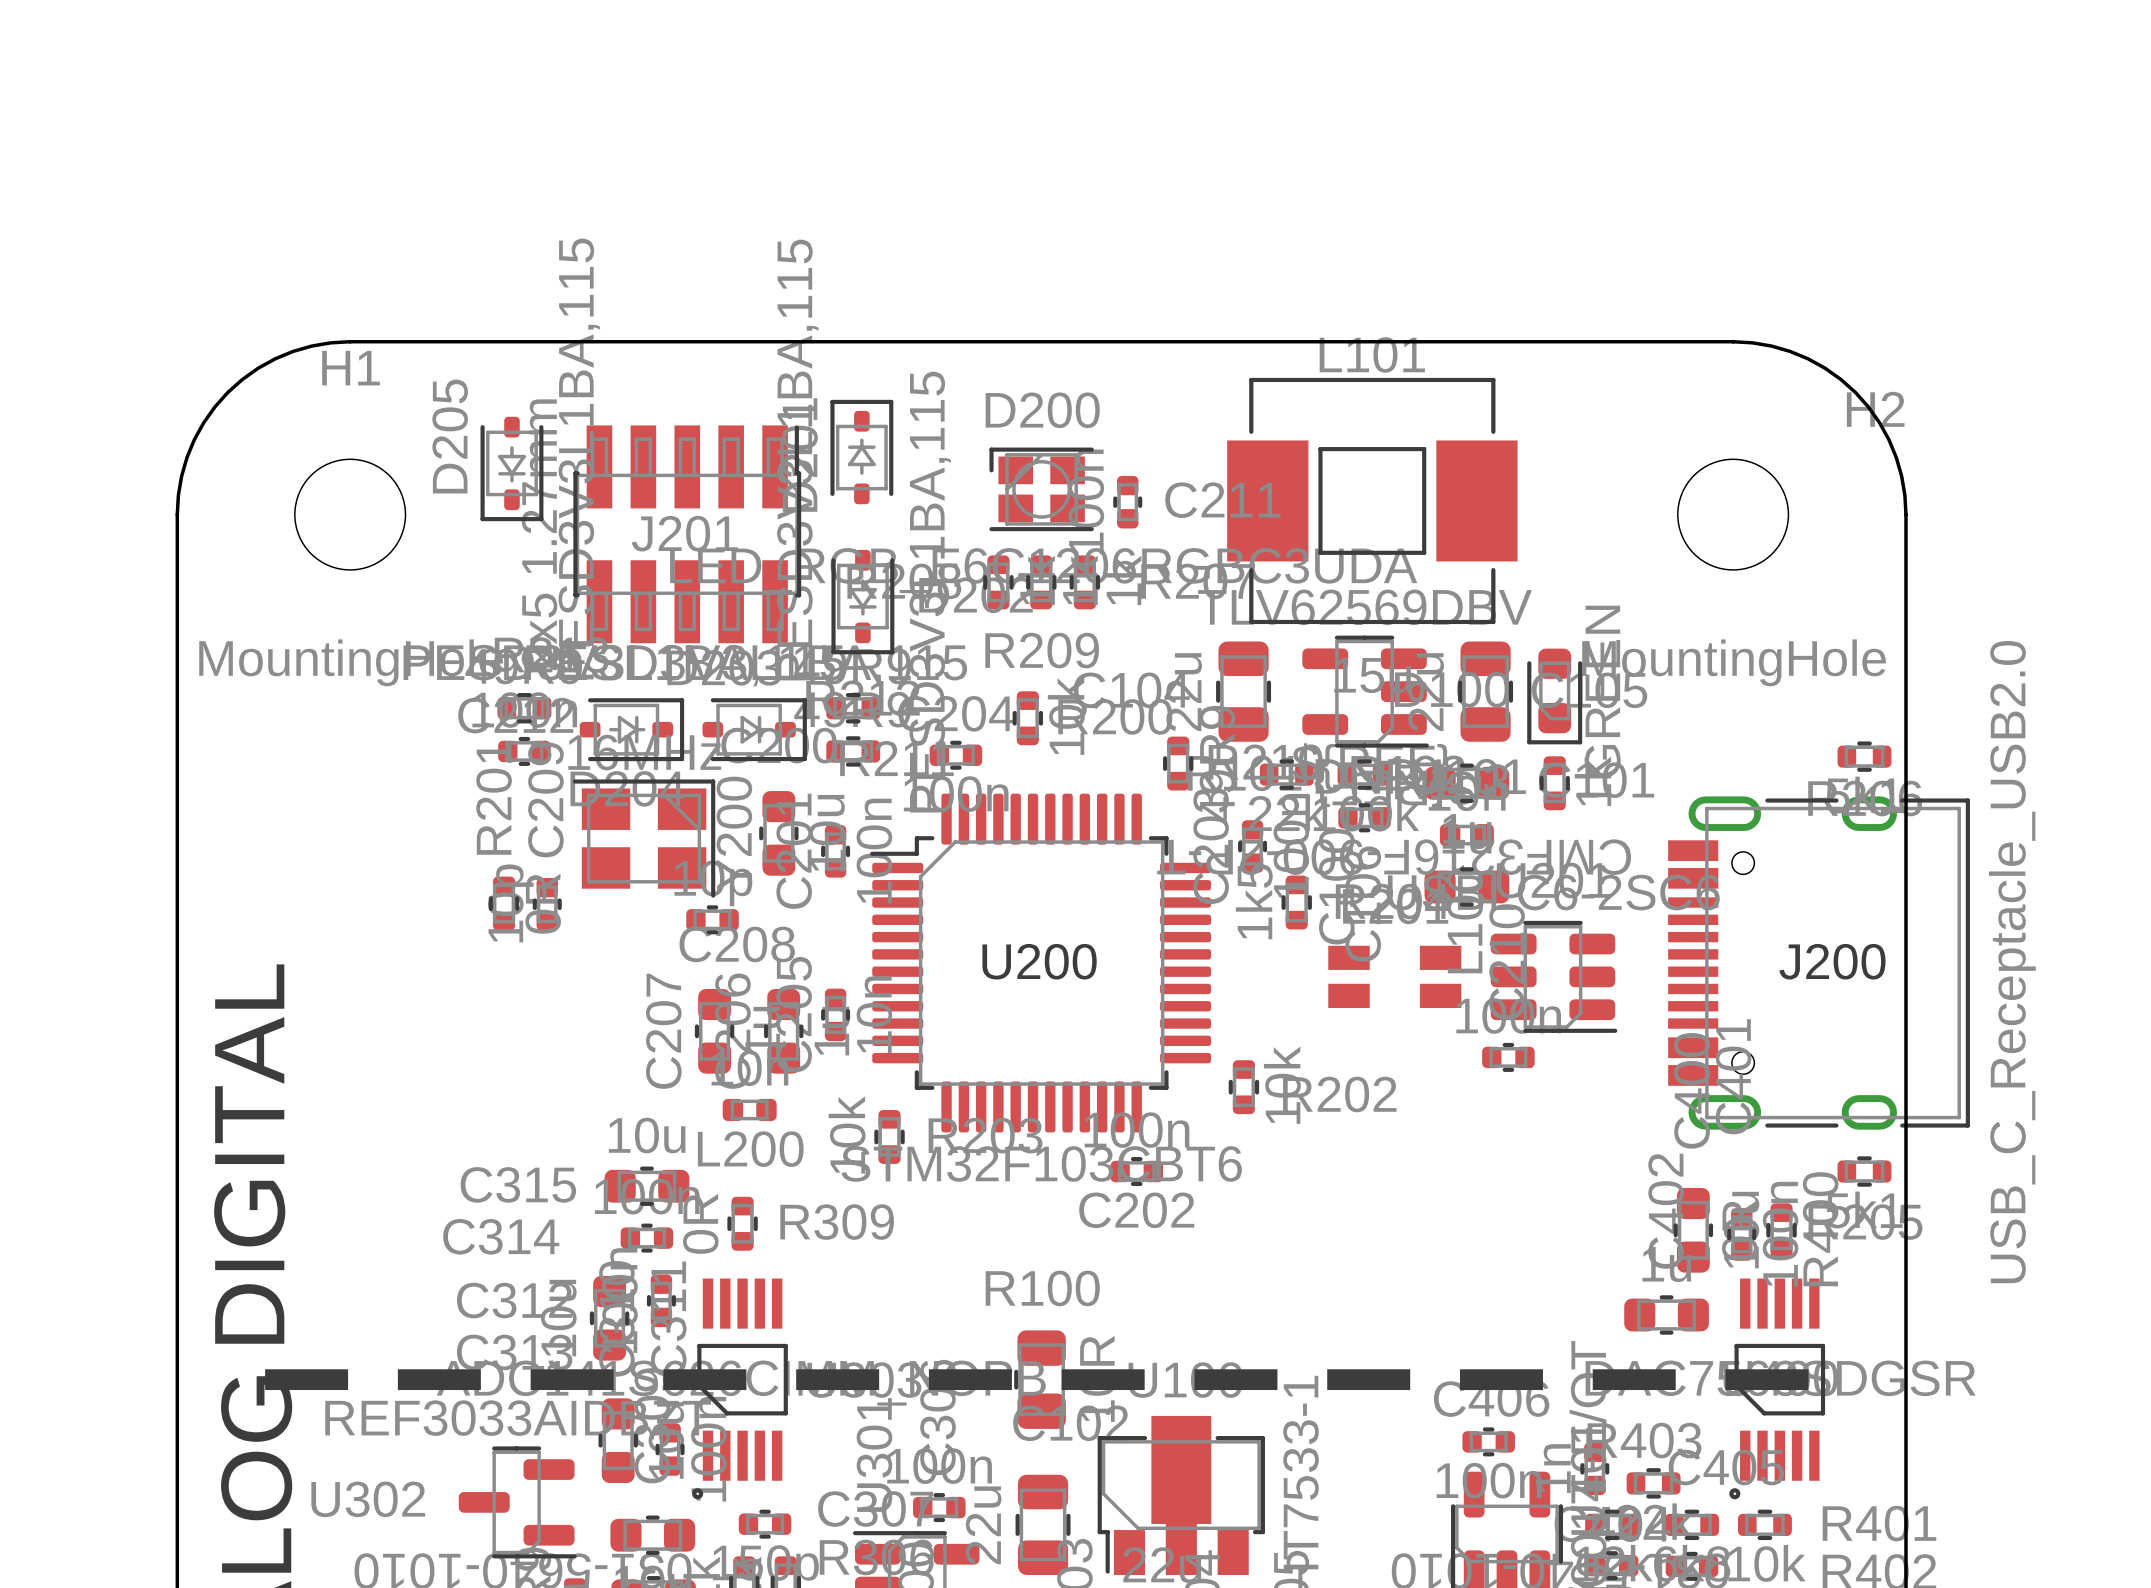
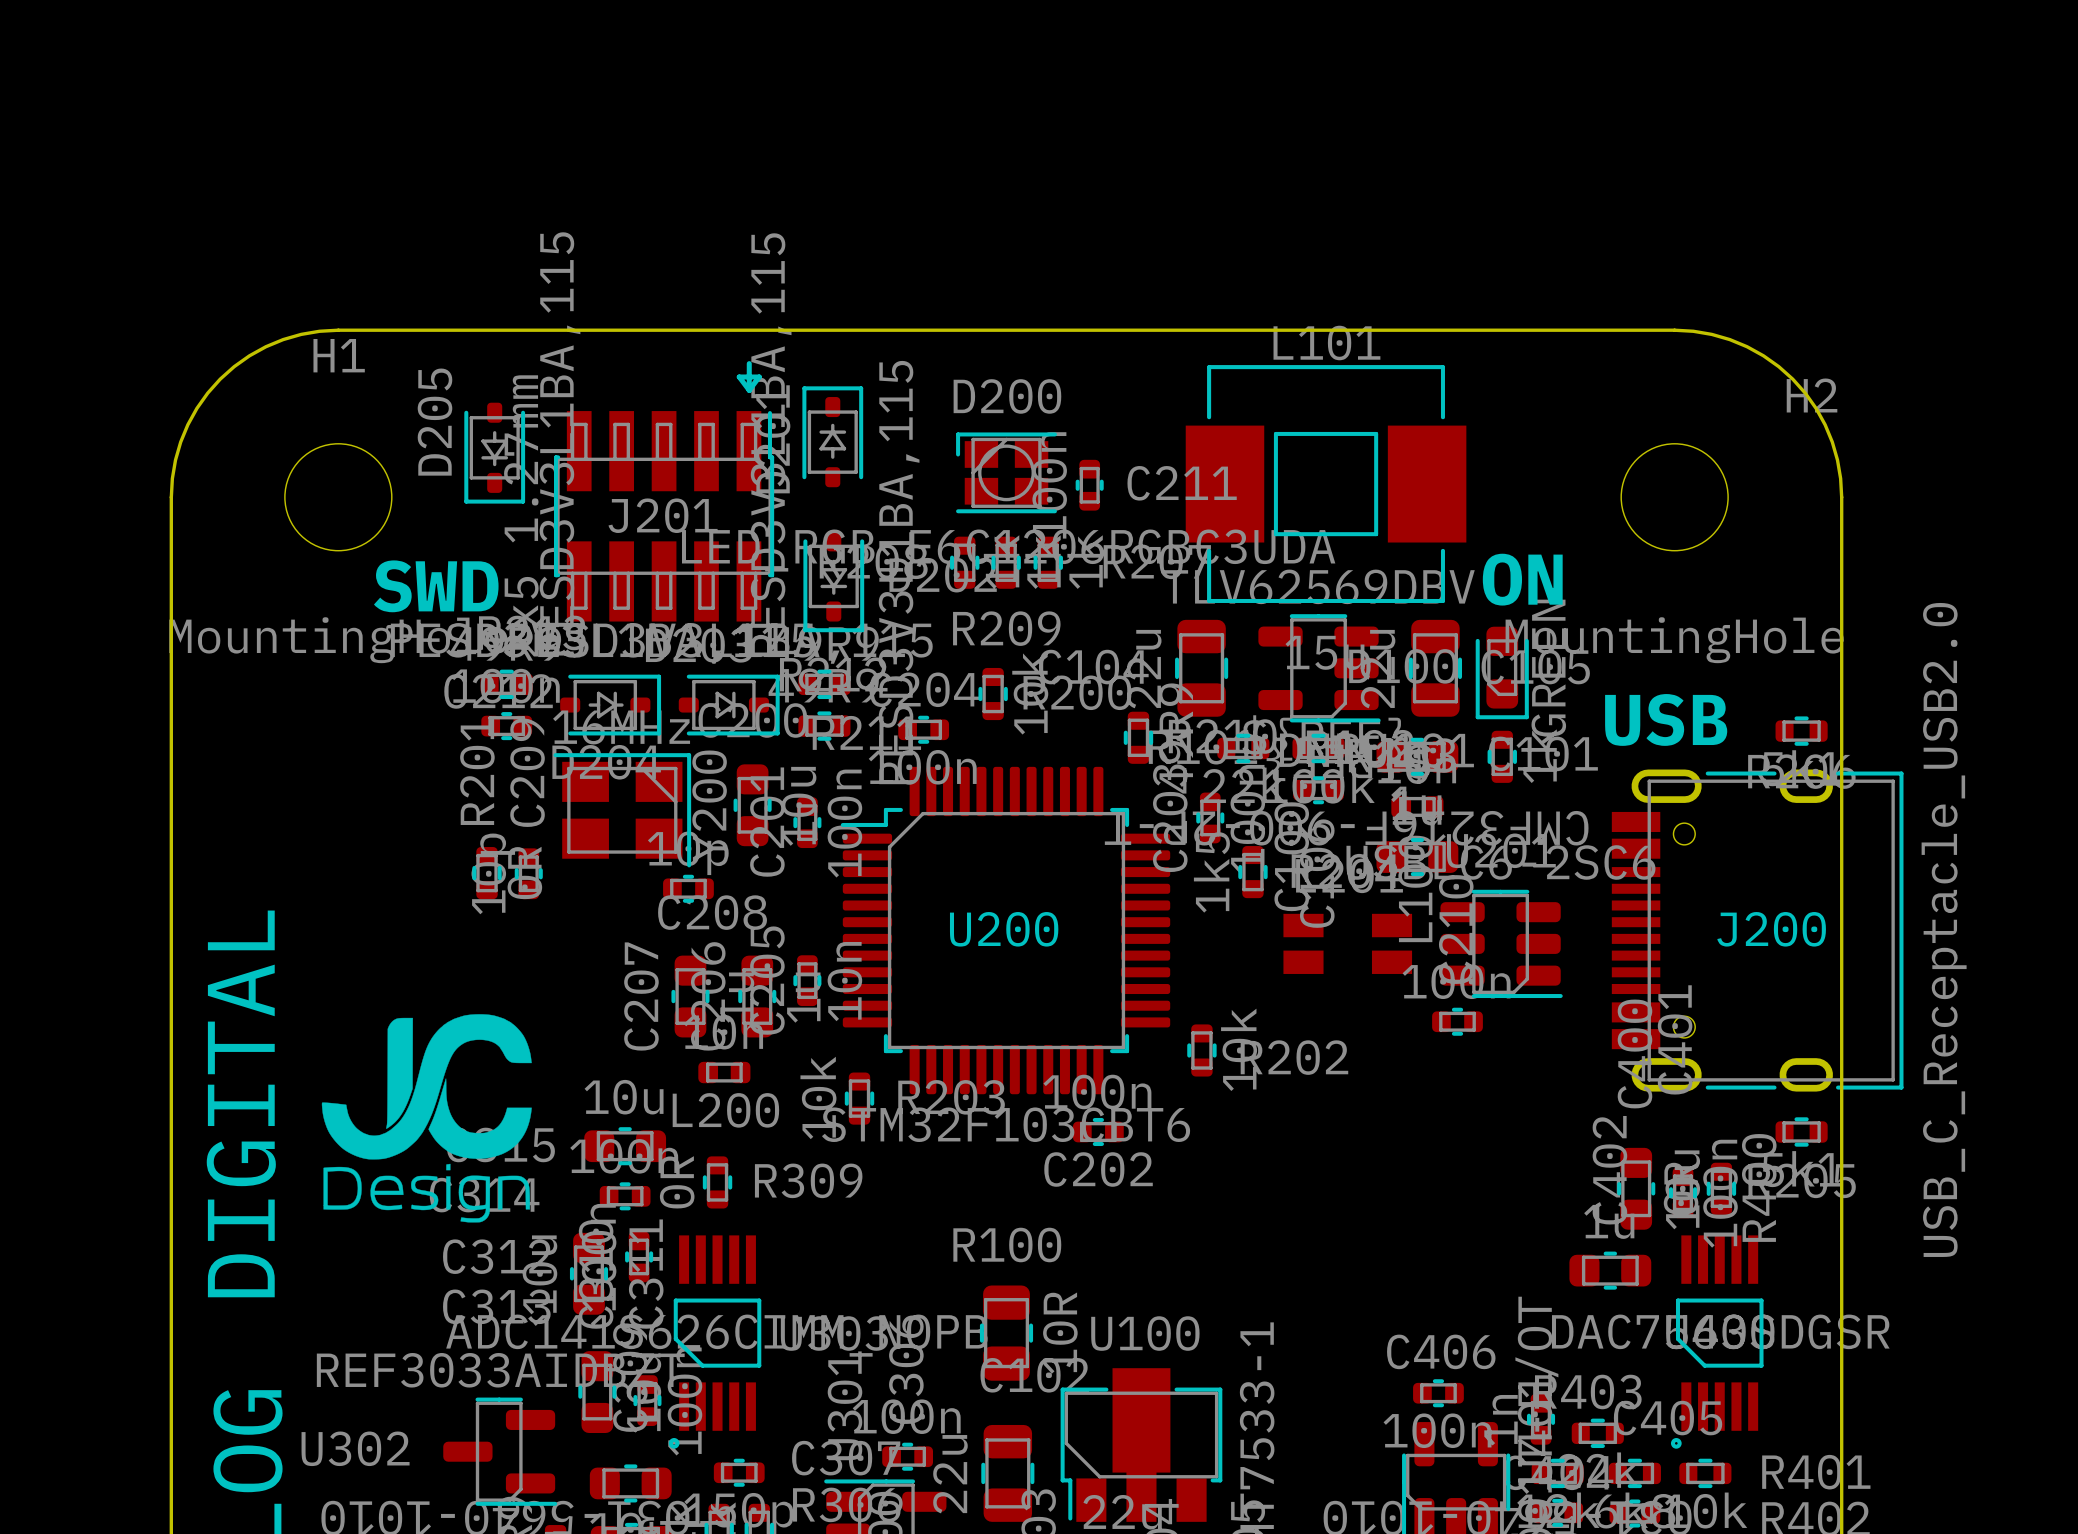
line: none -> (749, 363) (749, 390)
line: none -> (749, 390) (759, 376) (739, 376) (749, 390)
text: none -> ON (1522, 579)
text: none -> SWD (436, 586)
text: none -> USB (1666, 719)
drawing: none -> [321, 1014, 532, 1223]
line: (265, 1379) (1855, 1379) -> none

